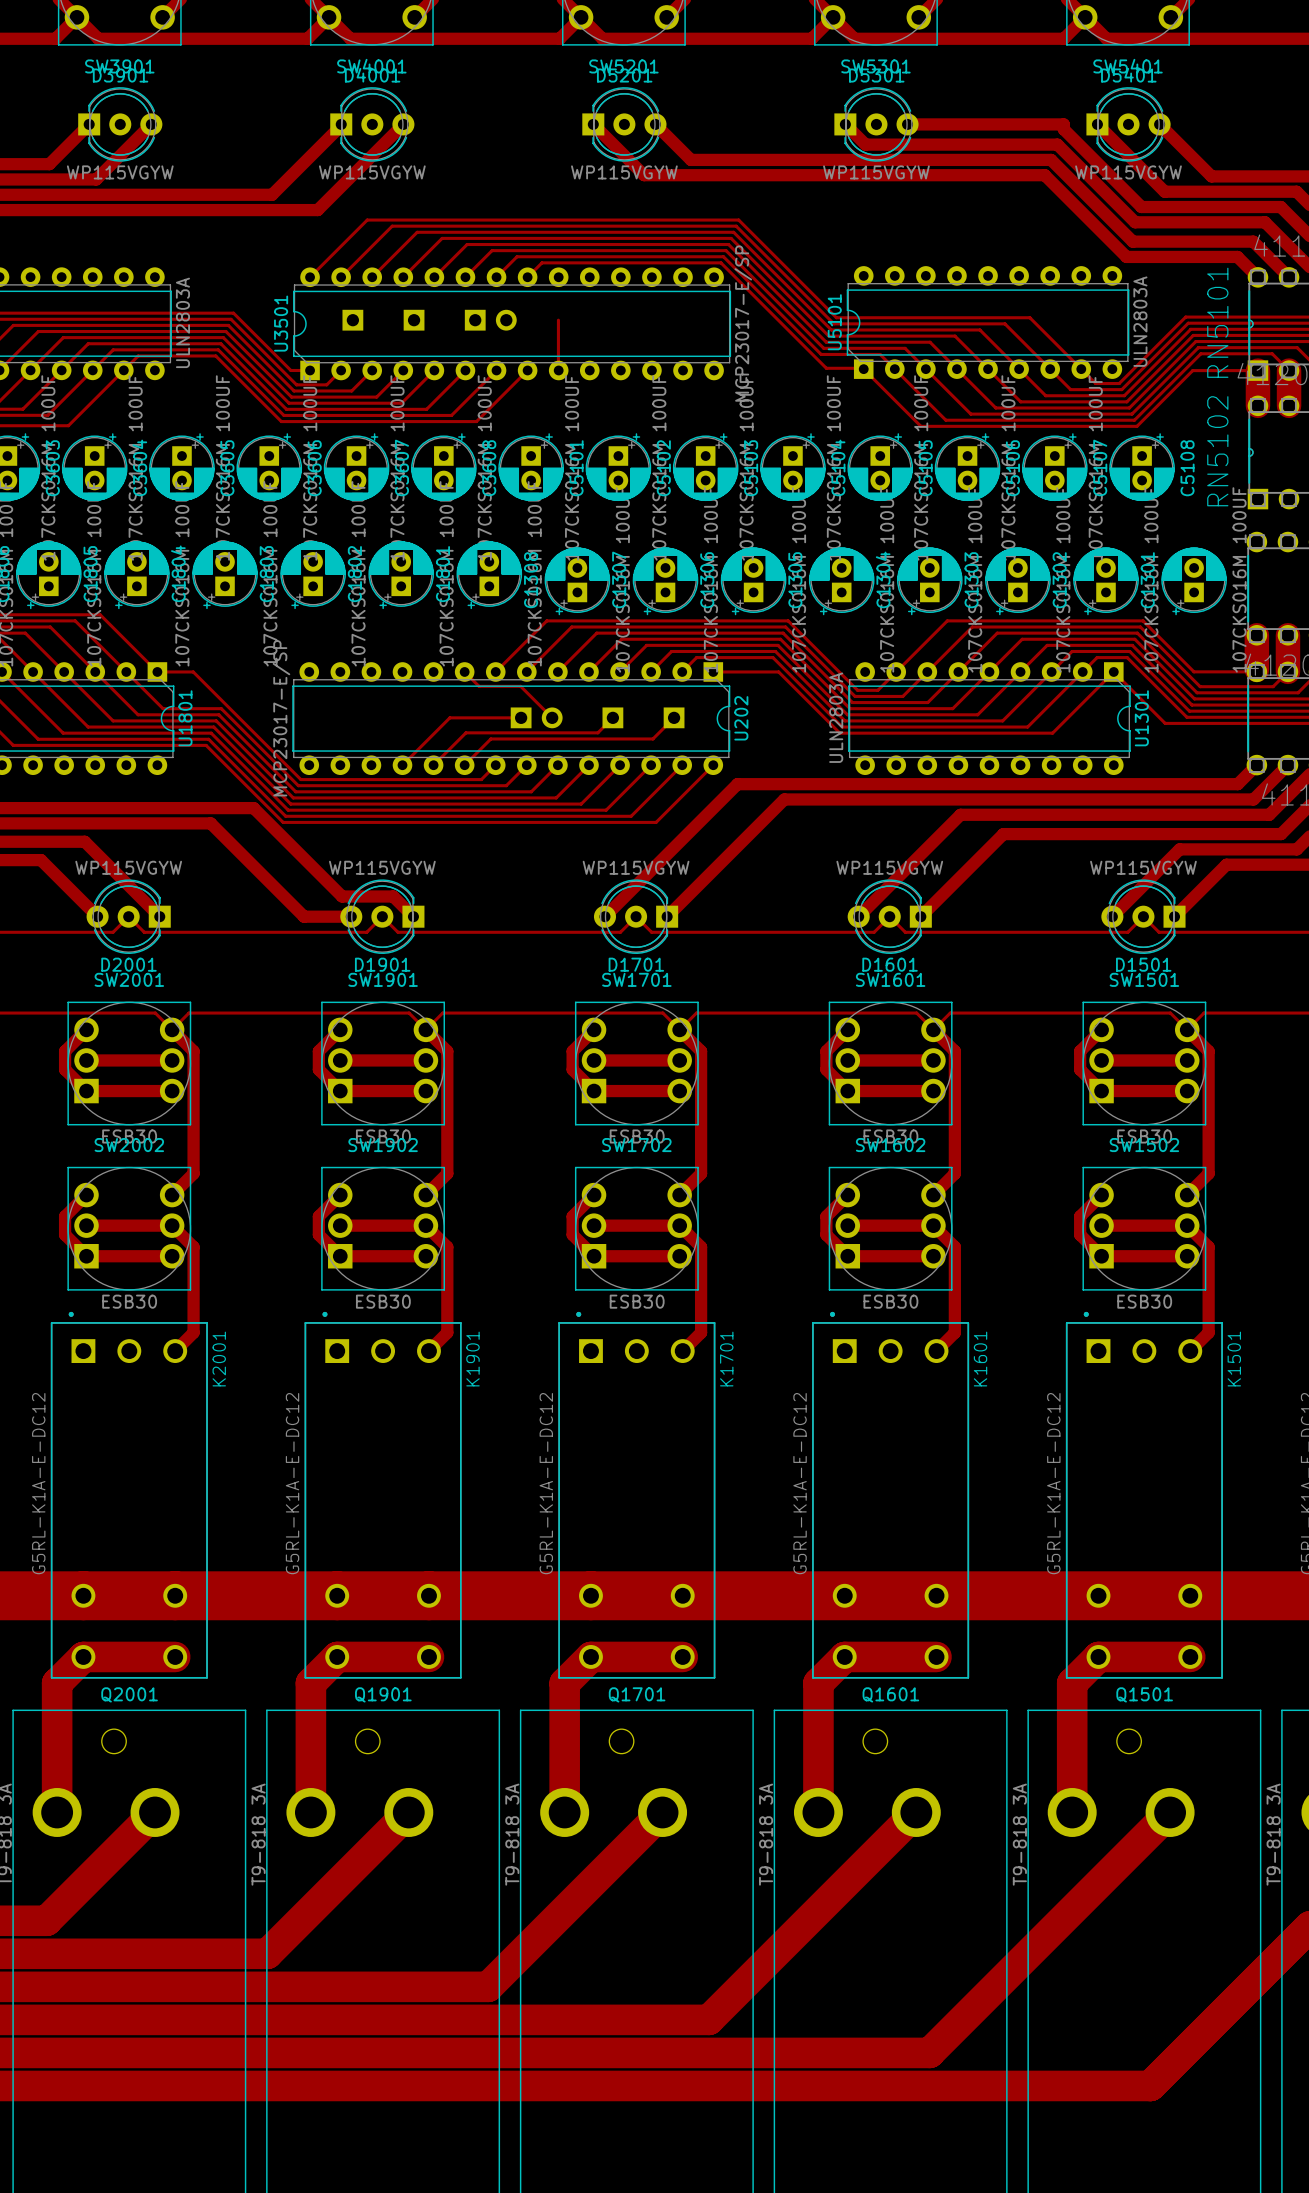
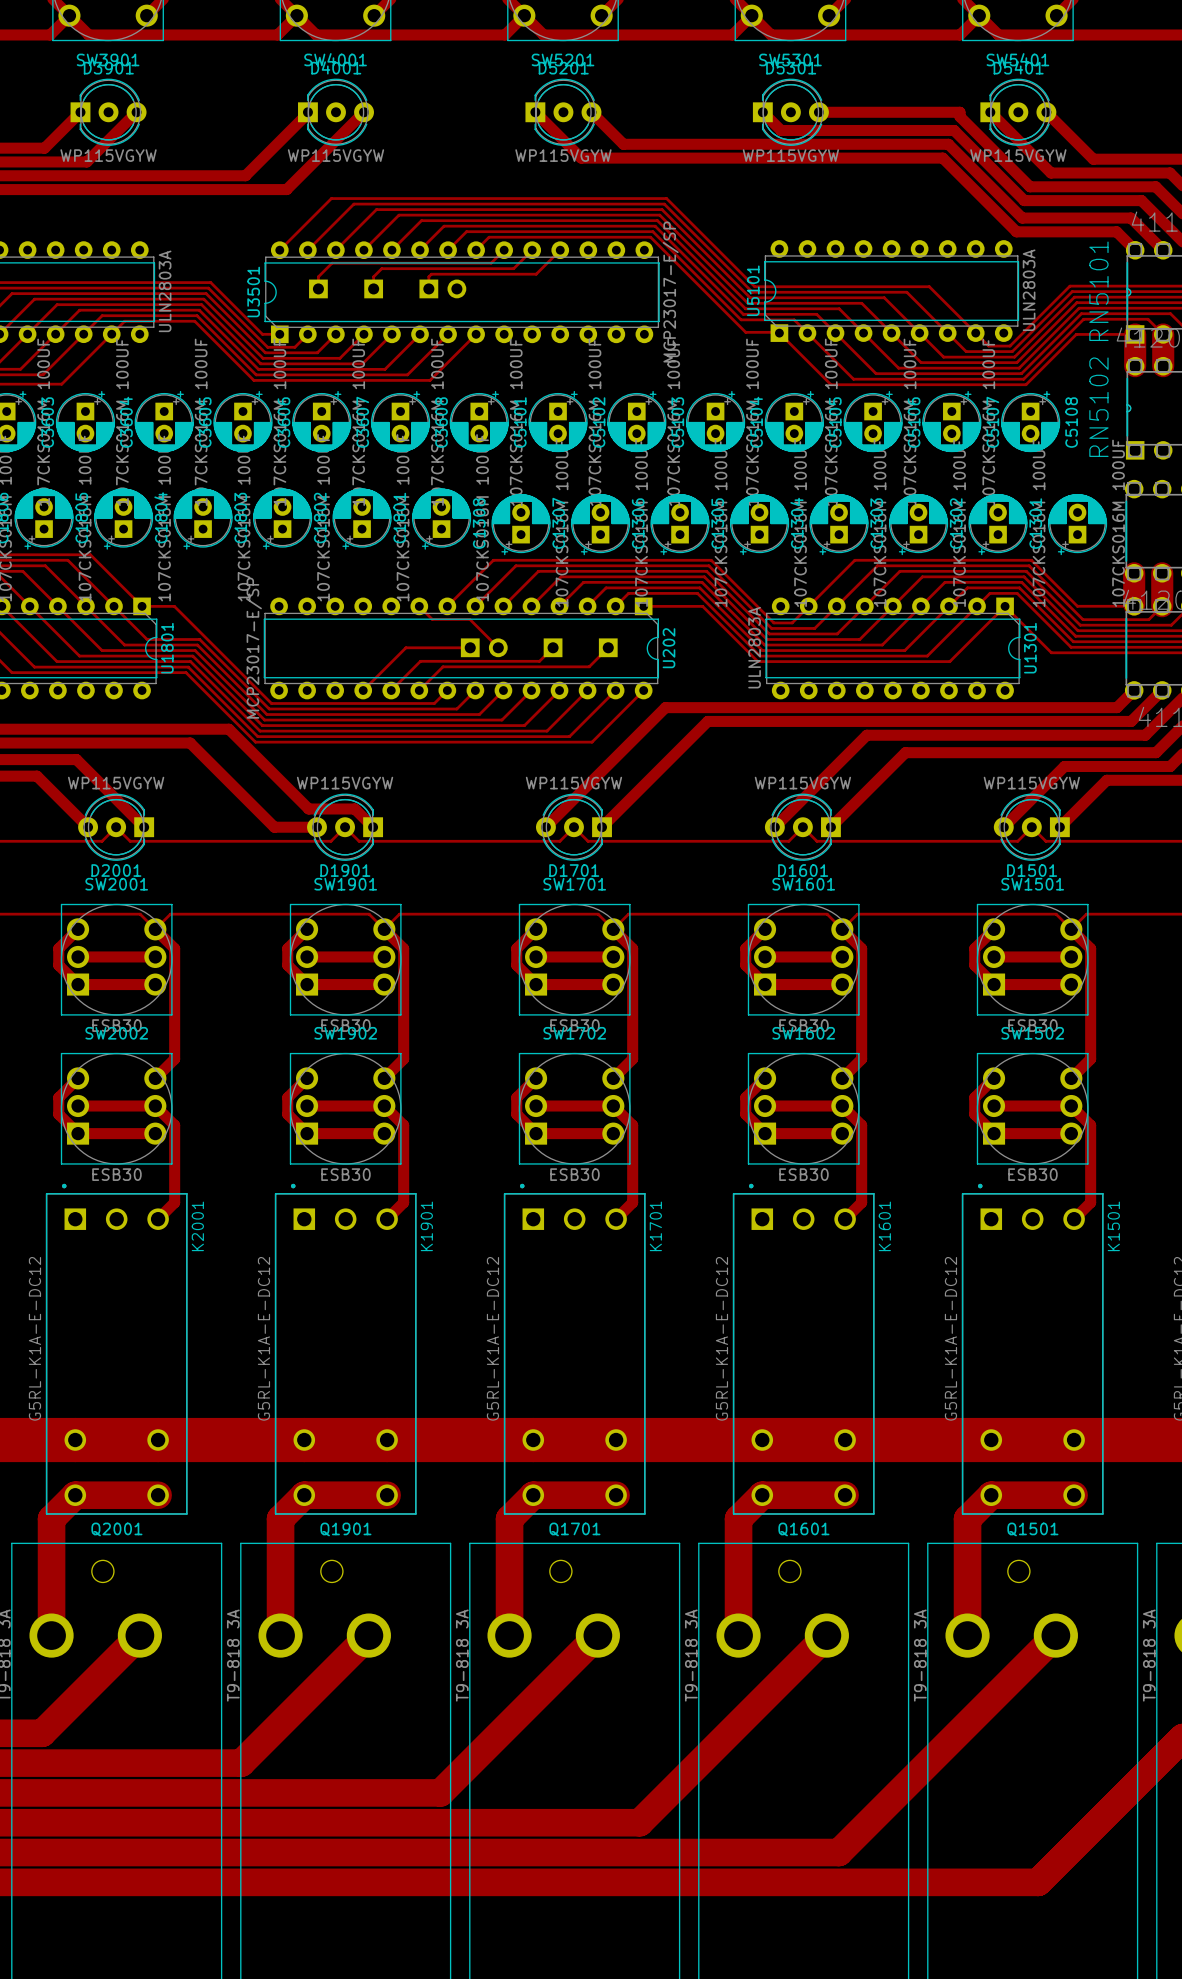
track: none -> (504, 250) (491, 263) (332, 263) (318, 276) (318, 288)
track: none -> (532, 250) (513, 268) (381, 268) (373, 276) (373, 288)
track: none -> (560, 250) (536, 274) (431, 274) (428, 276) (428, 288)
track: (558, 320) (558, 370) -> none

